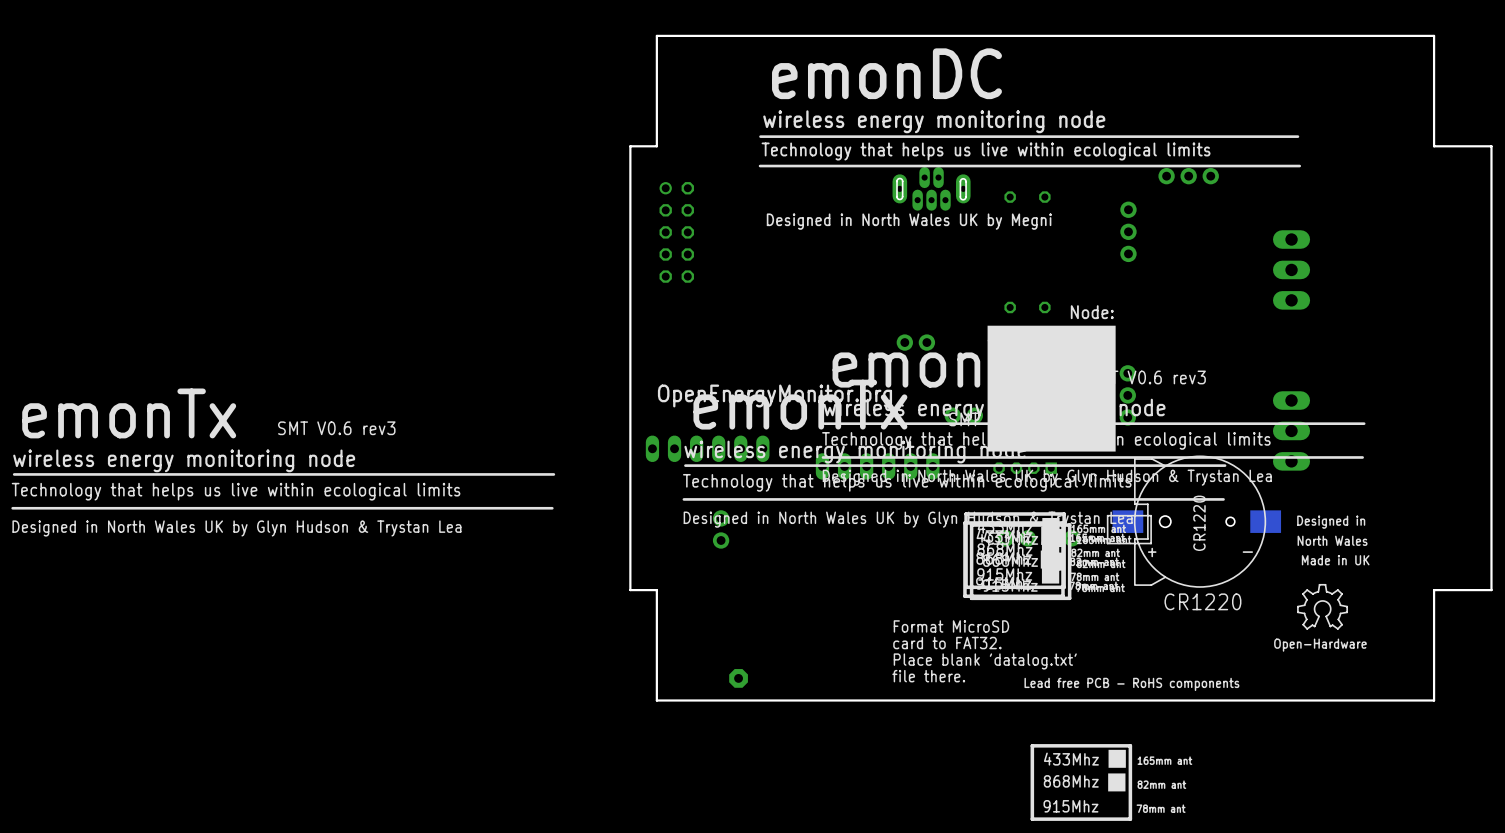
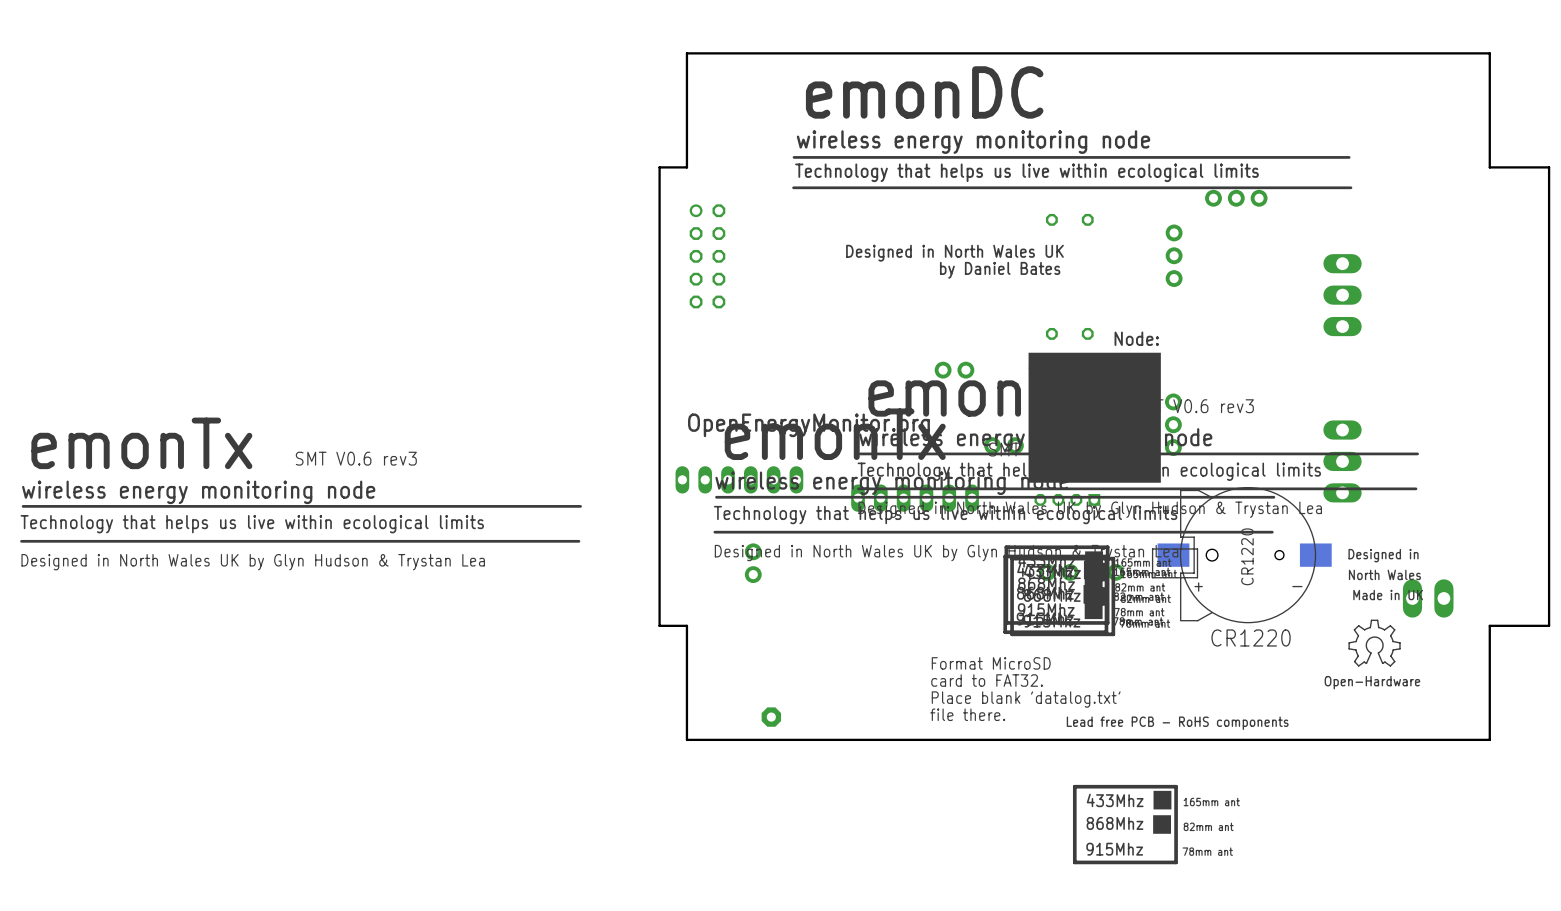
part: (931, 188) -> none
text: Designed in North Wales UK by Megni (909, 221) -> Designed in North Wales UK (954, 253)
text: none -> by Daniel Bates (1000, 270)
part: none -> (1428, 598)

